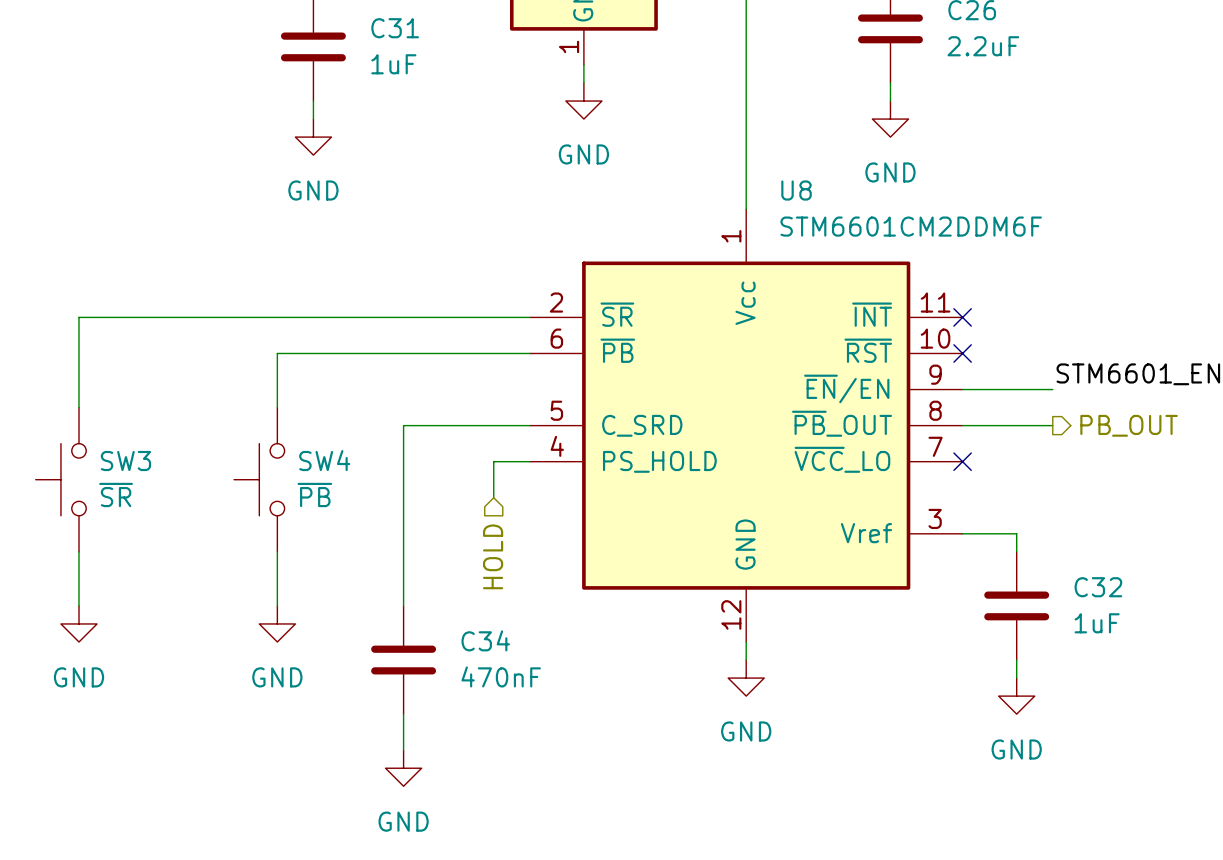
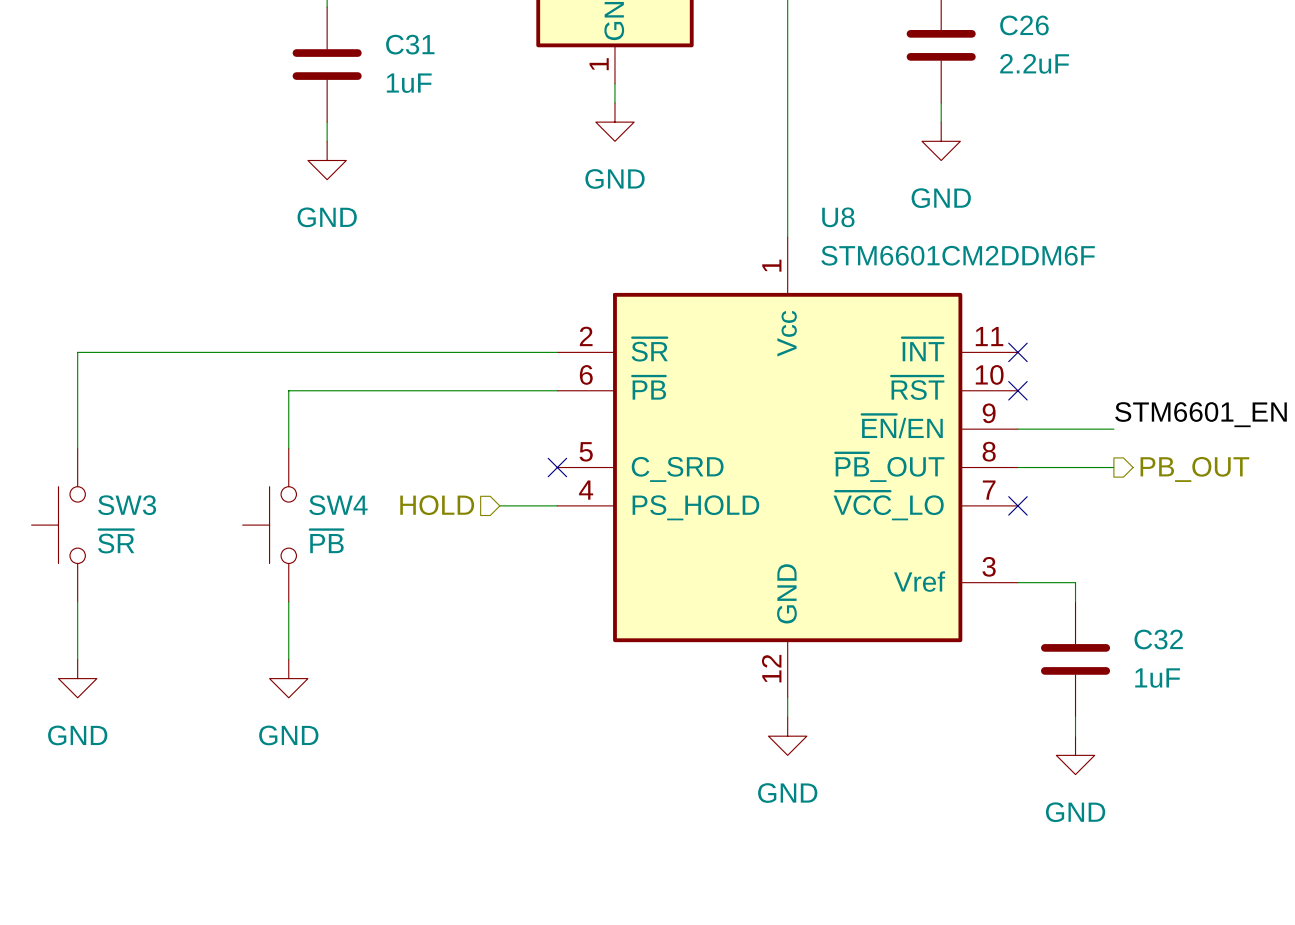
wire: (529, 425) (403, 425) (403, 605) -> none
no-connect mark: none -> (557, 467)
wire: (493, 461) (493, 497) -> (519, 505) (499, 505)
hierarchical label rotation: 0° (493, 556) -> 90° clockwise (437, 505)
hierarchical label position: HOLD (493, 556) -> HOLD (437, 505)
C34: 470nF (403, 660) -> none
wire: (403, 714) (403, 750) -> none
power symbol: GND (403, 768) -> none

